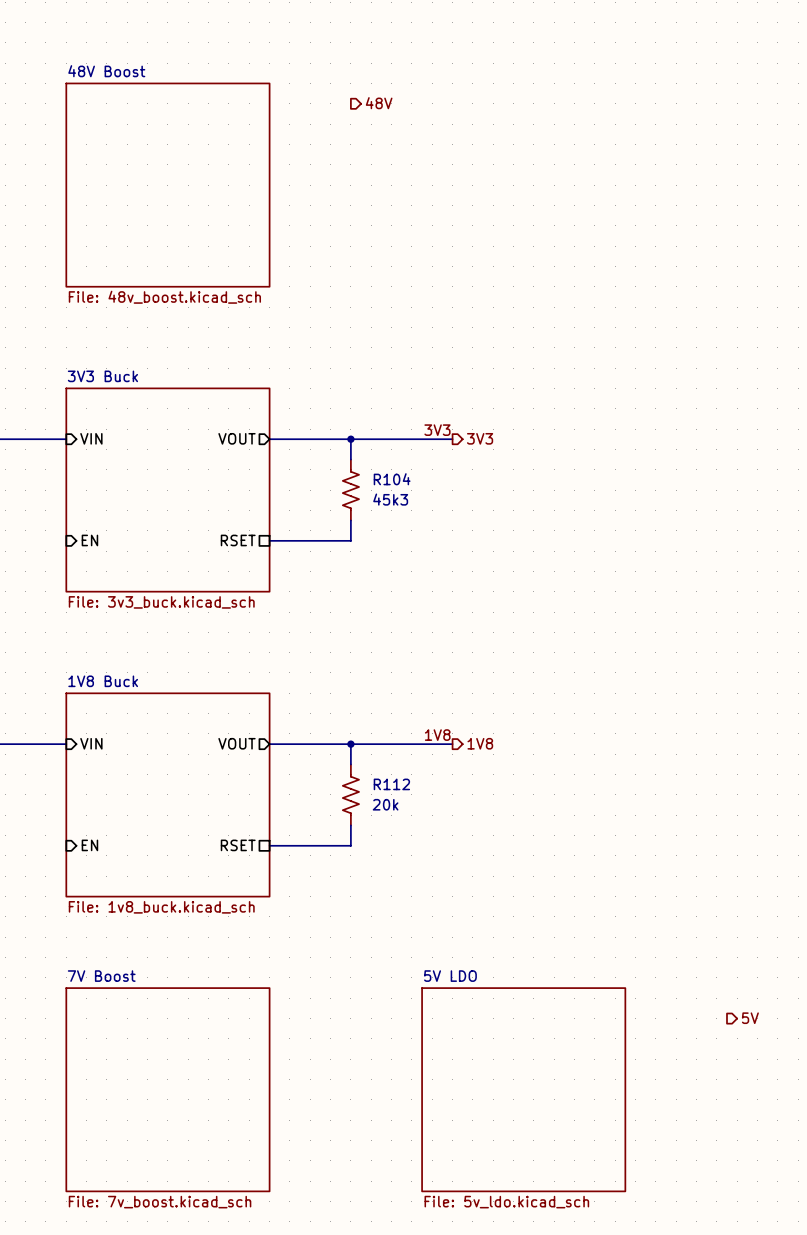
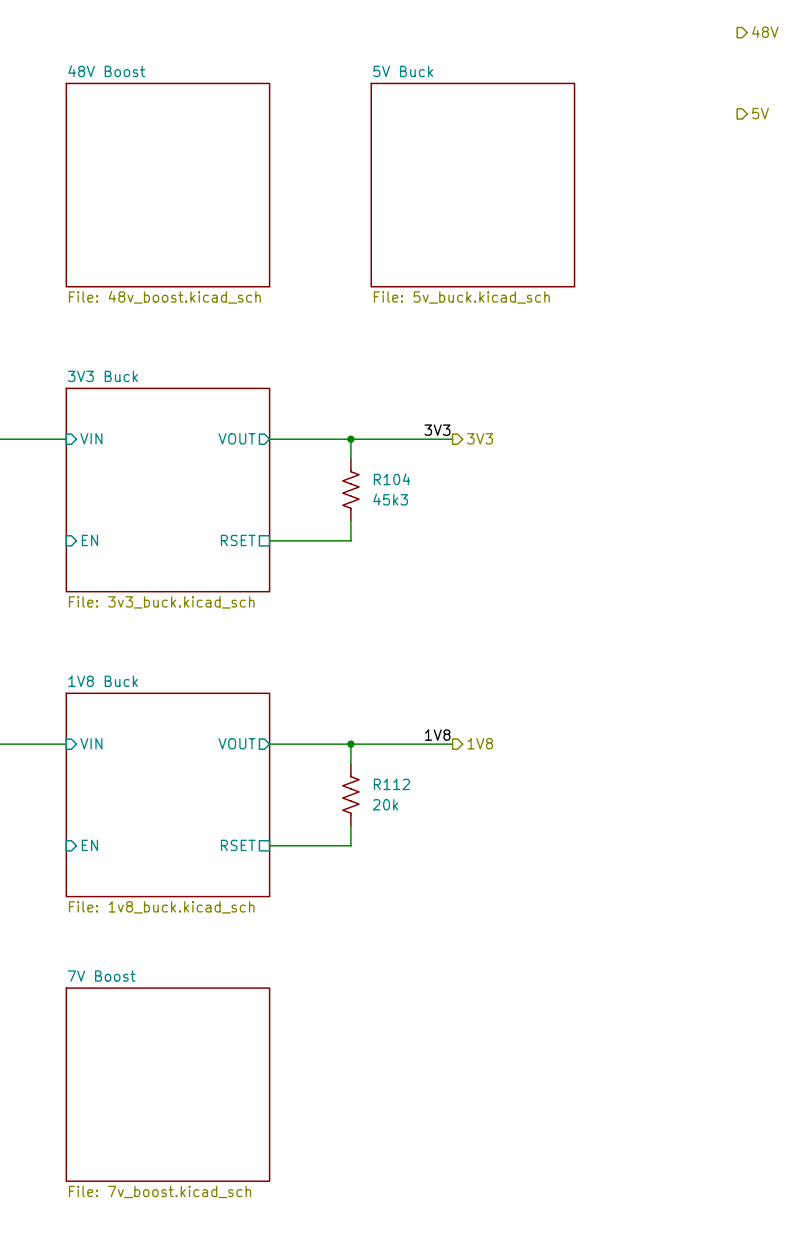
hierarchical label: none -> 48V (765, 32)
hierarchical label: 48V (379, 103) -> none
hierarchical label: none -> 5V (760, 113)
sheet 5V Buck: none -> File: 5v_buck.kicad_sch (472, 185)
sheet 7V Boost shape: [65, 987, 271, 1192] -> [65, 987, 271, 1182]
hierarchical label: 5V (750, 1018) -> none
sheet 5V LDO: File: 5v_ldo.kicad_sch (523, 1089) -> none

